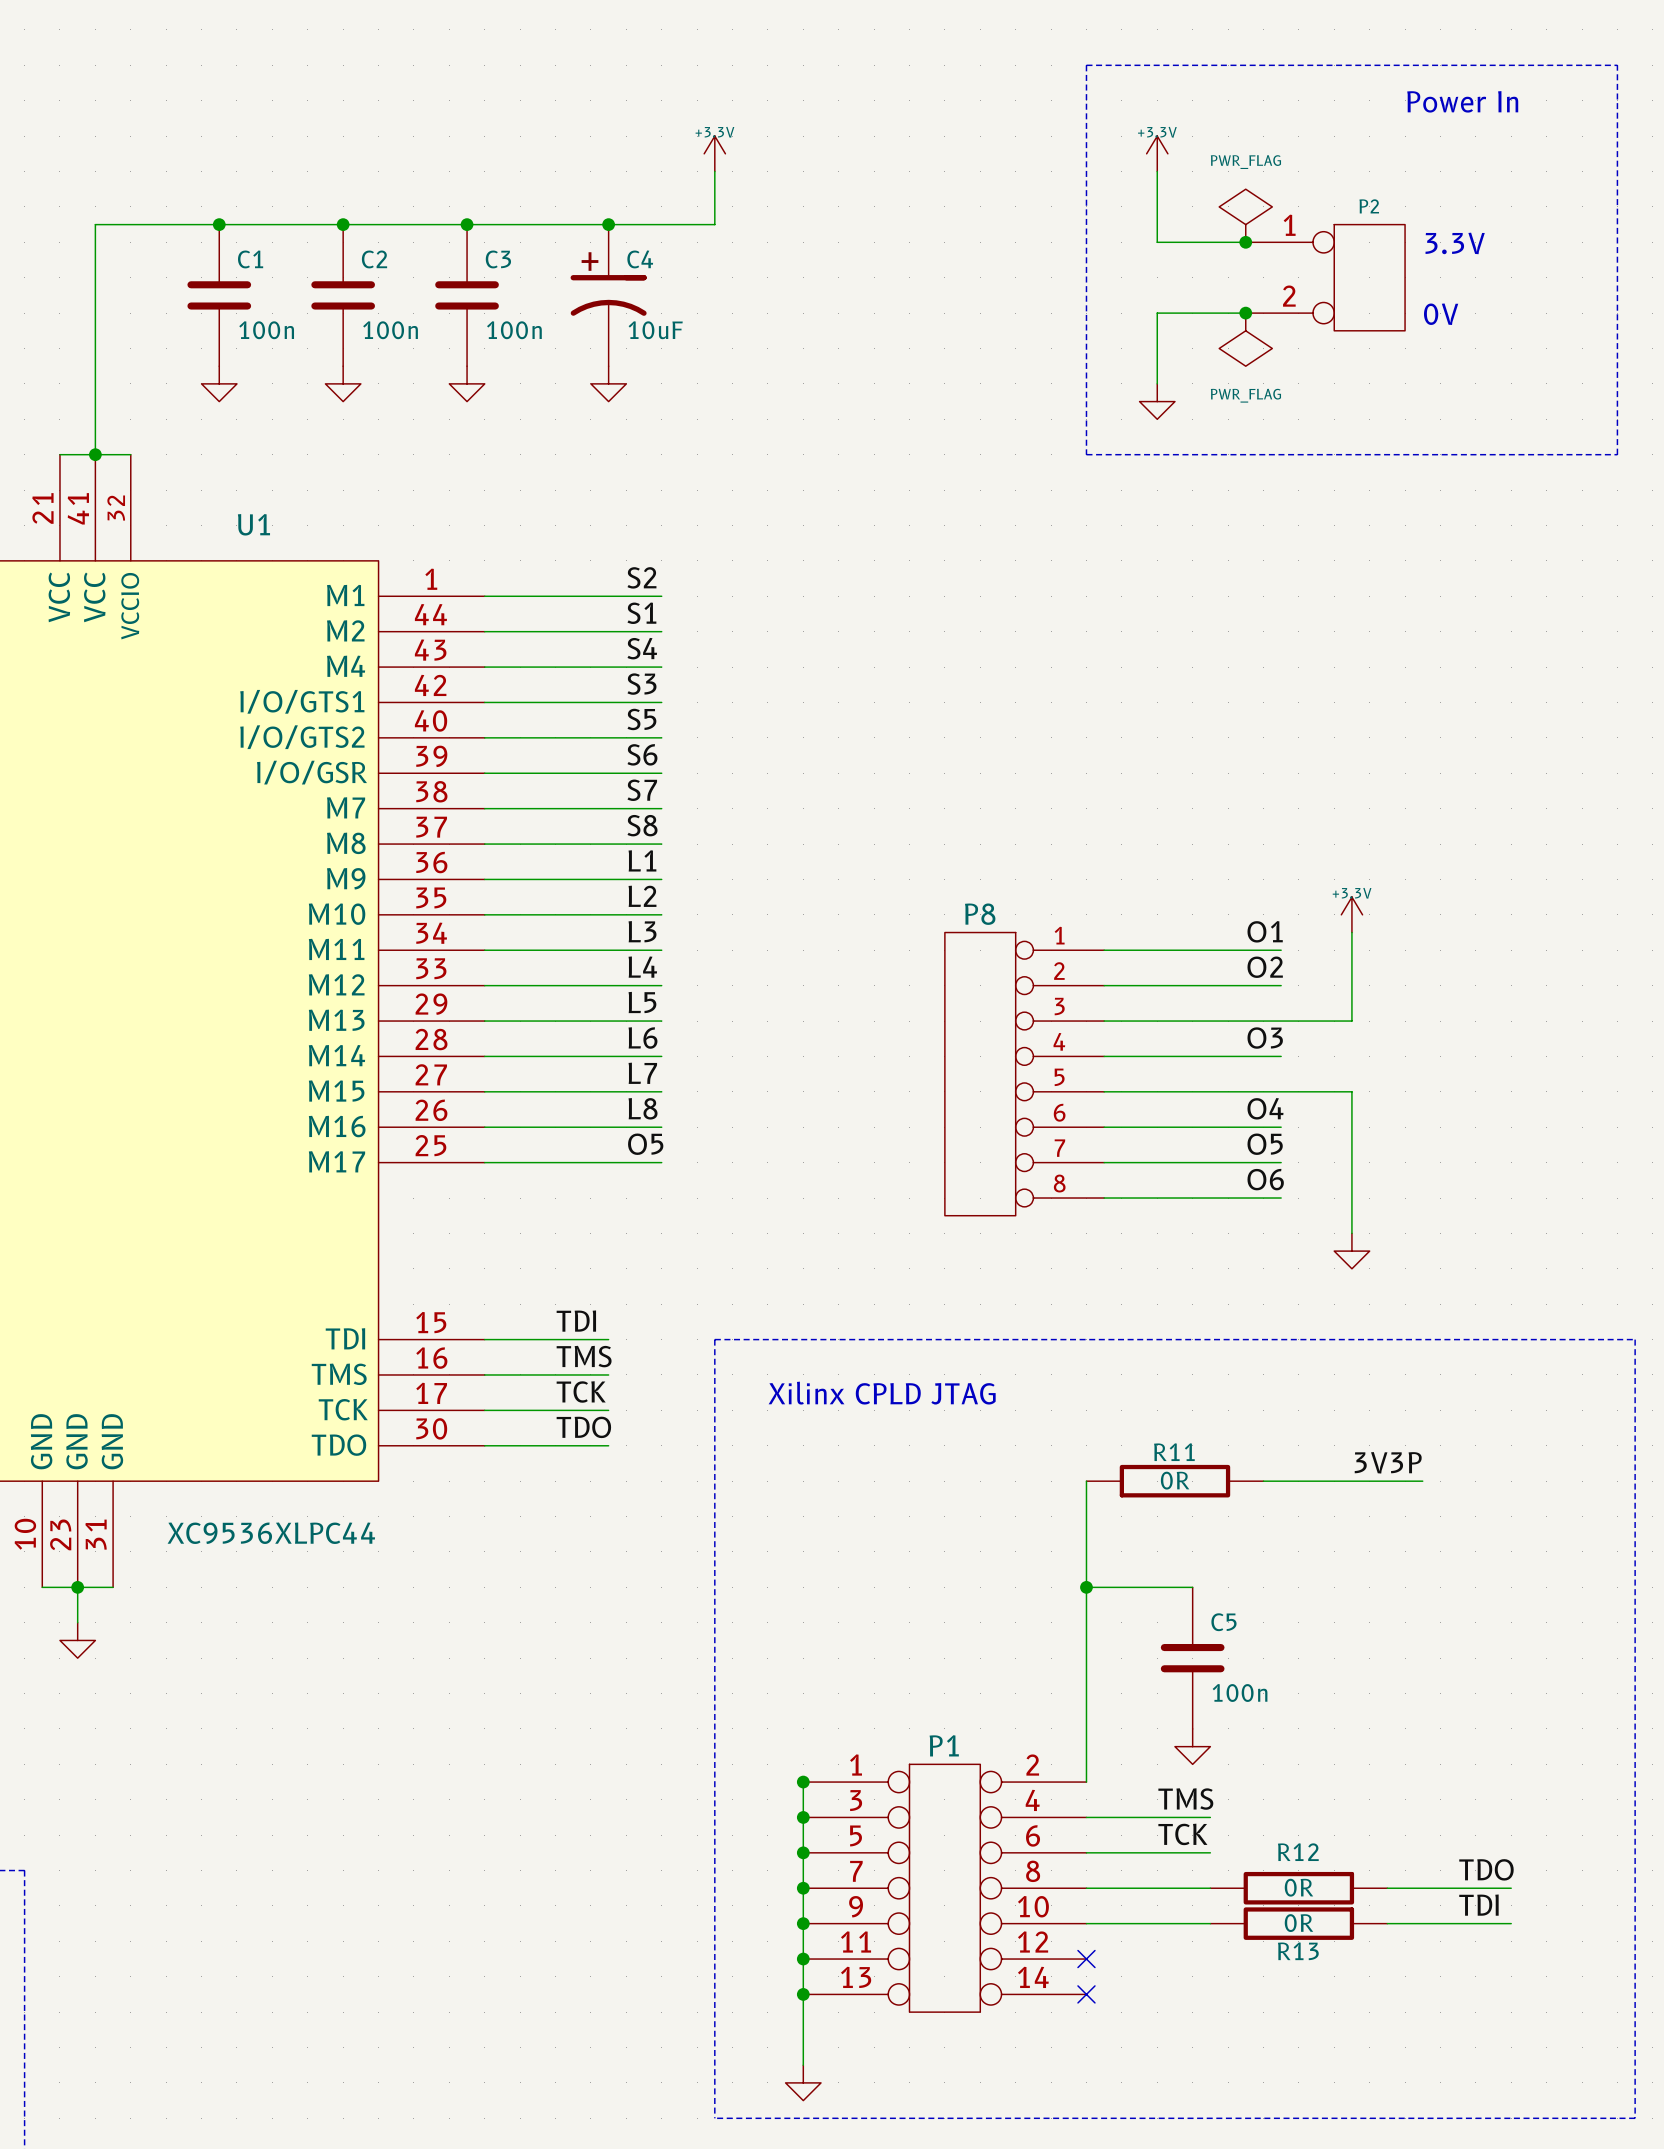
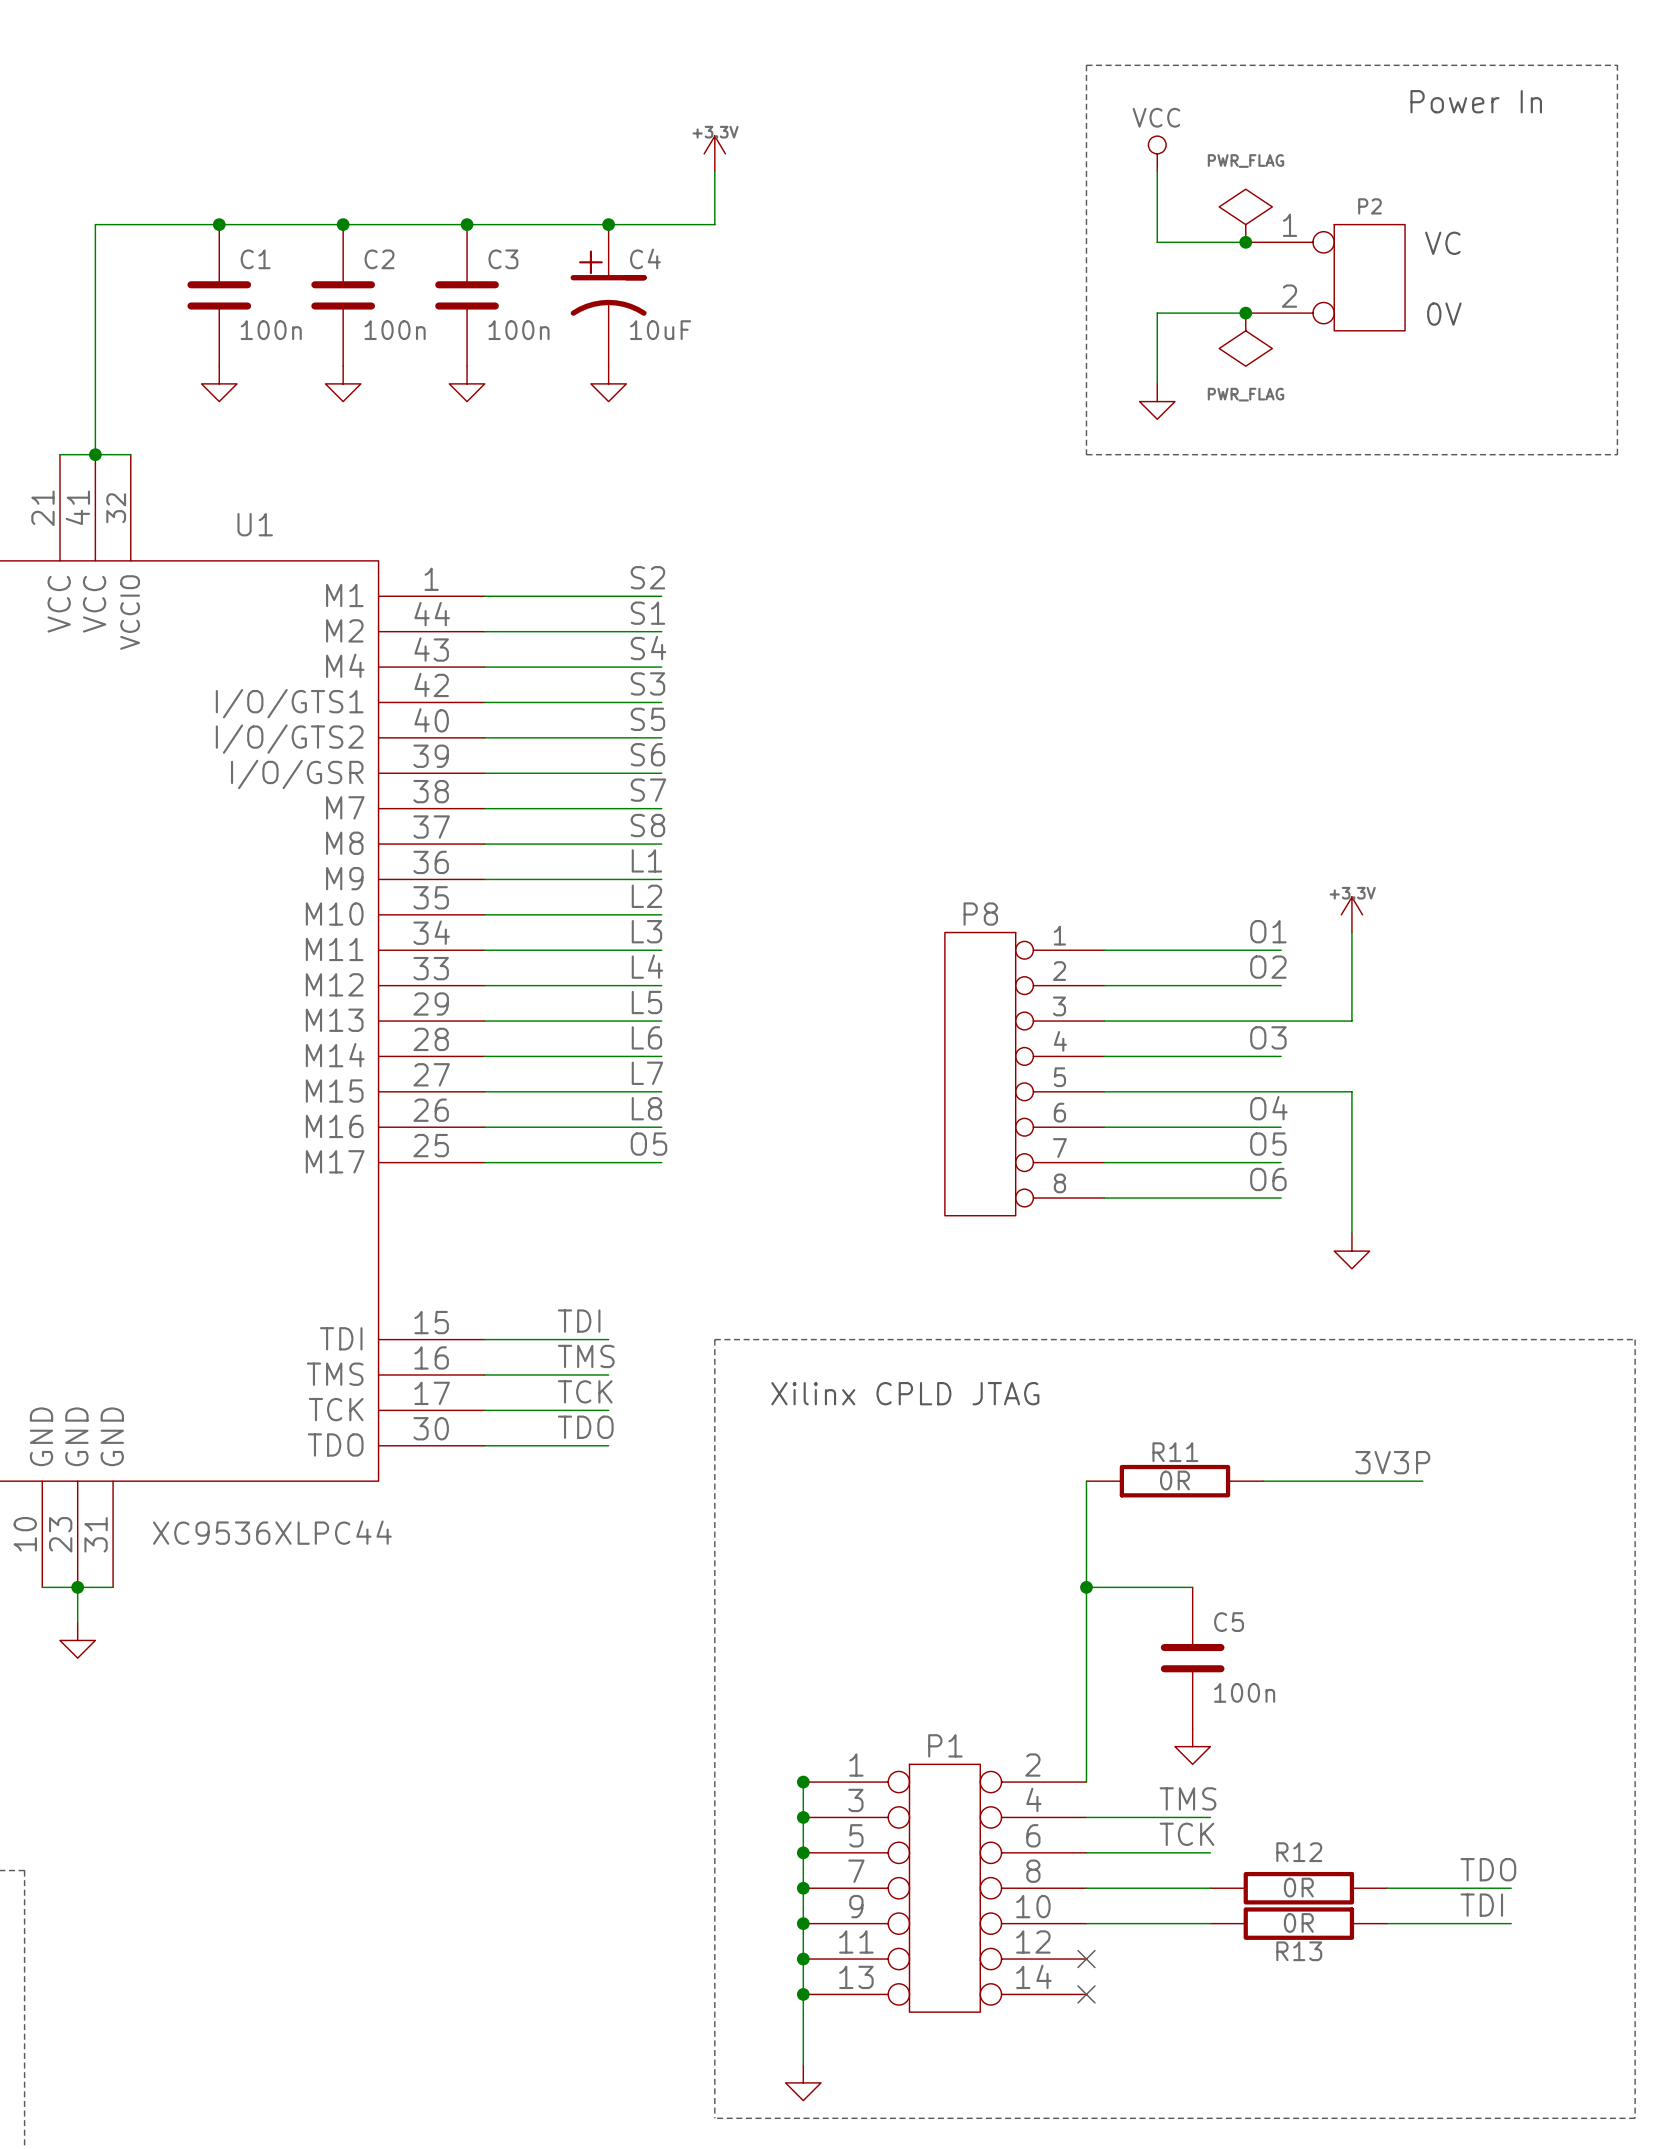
power symbol: +3.3V (1157, 153) -> VCC (1157, 153)
text: 3.3V (1455, 243) -> VC (1442, 243)

